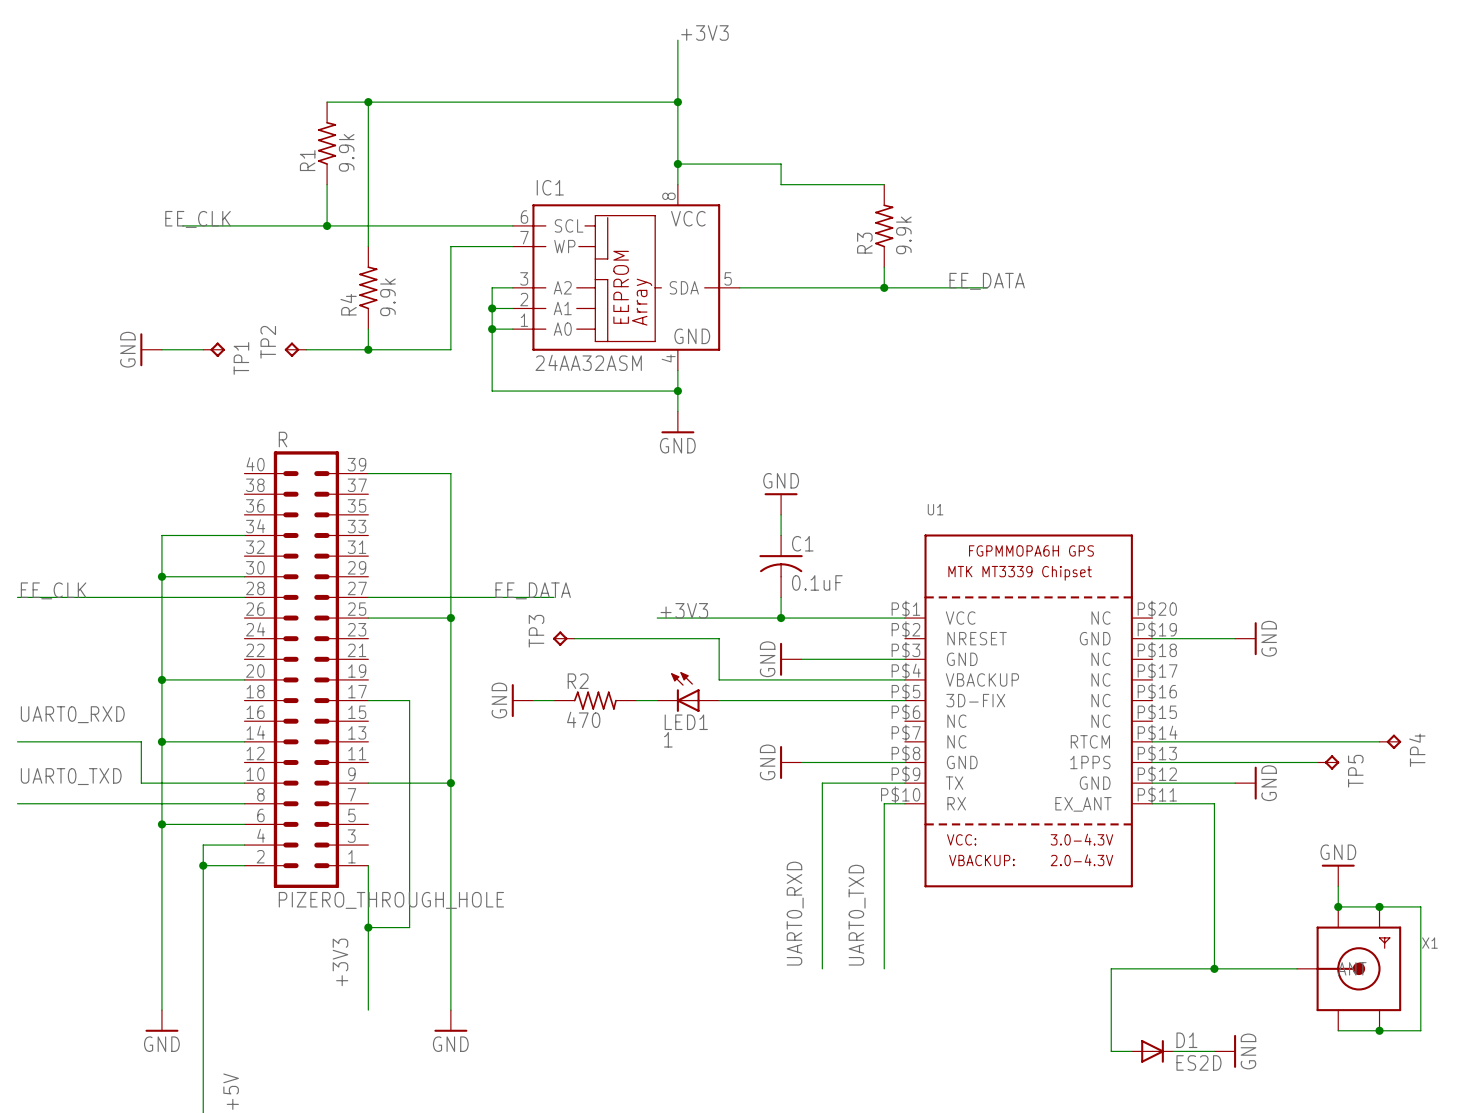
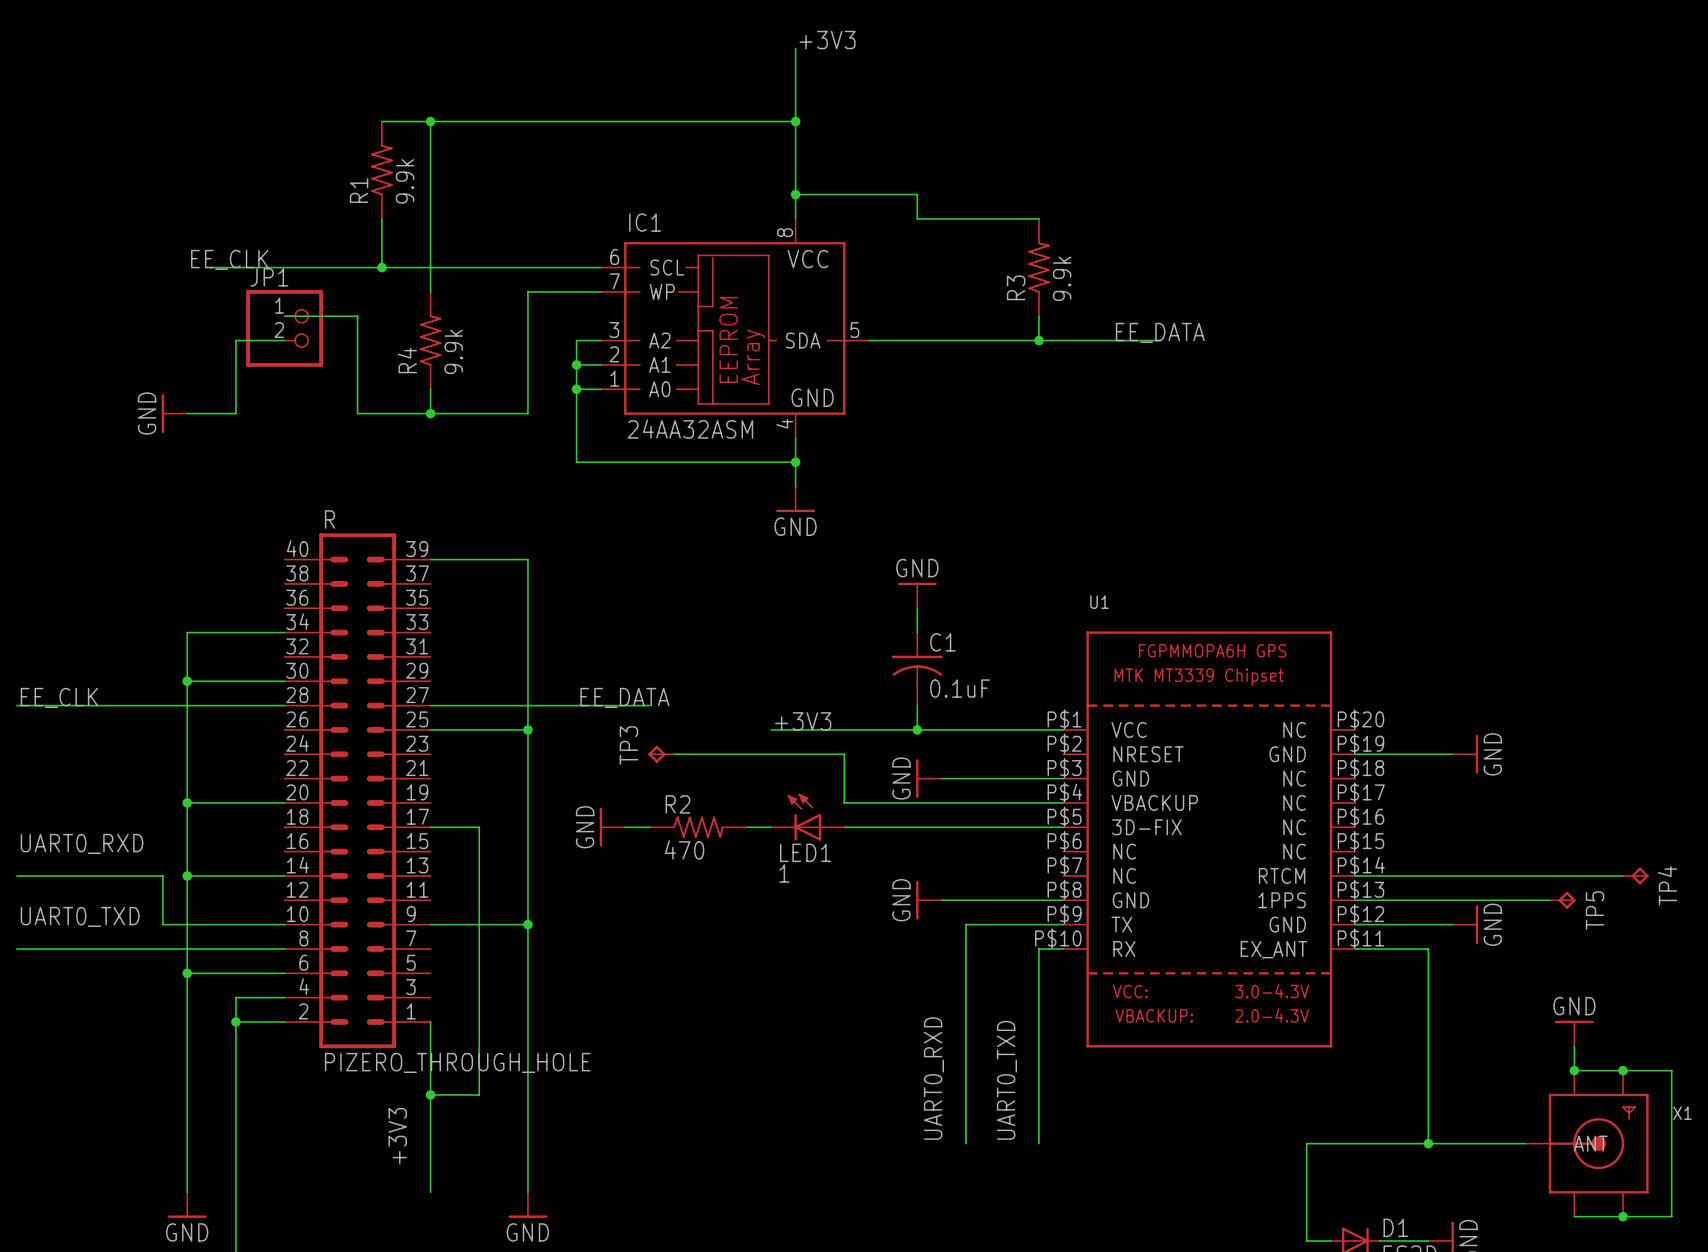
wire: none -> (284, 316) (357, 316) (357, 413)
JP1: none -> (284, 328)
wire: none -> (284, 340) (235, 340) (235, 413)
TP1: (214, 349) -> none
TP2: (295, 349) -> none

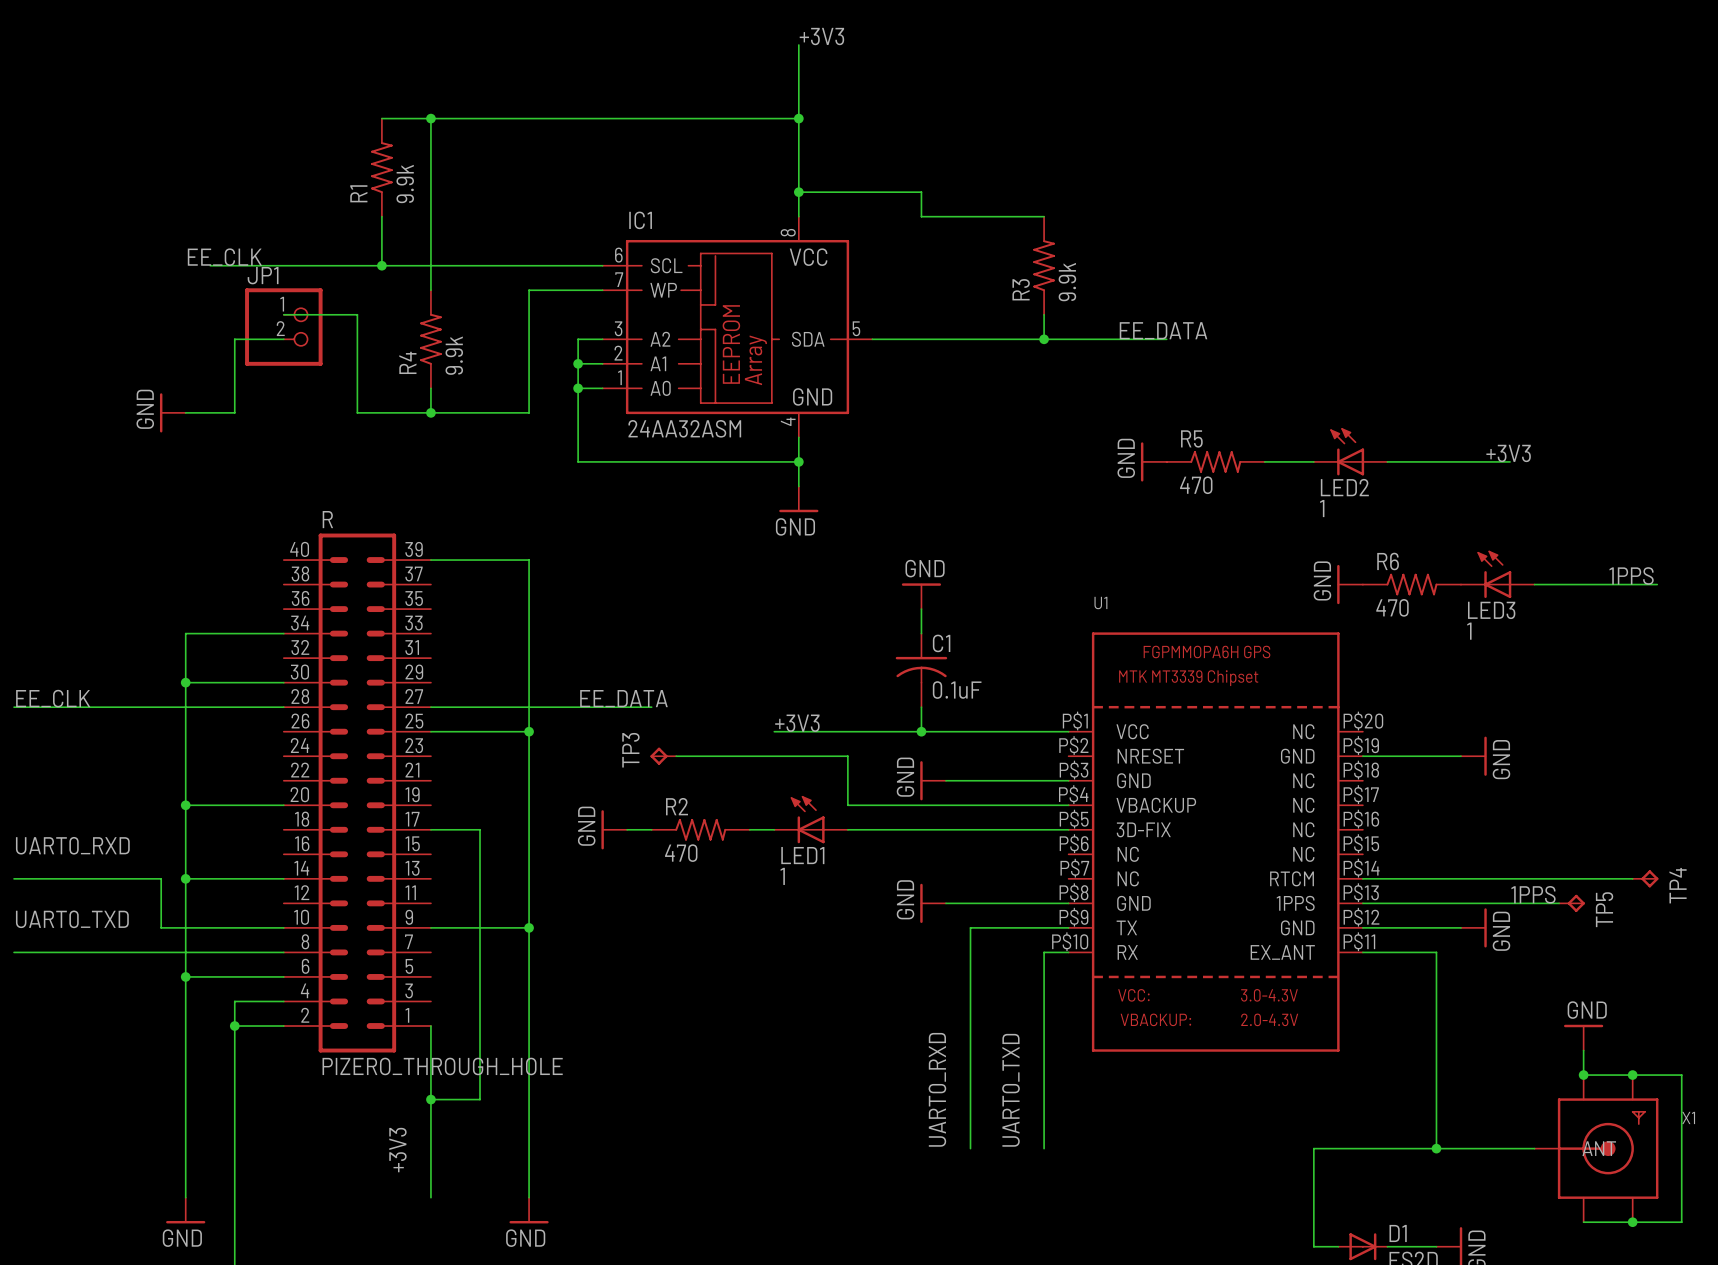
LED2: none -> 1 (1350, 451)
label: none -> +3V3 (1508, 453)
power symbol: none -> GND (1153, 461)
R5: none -> 470 (1215, 461)
wire: none -> (1264, 461) (1313, 461)
wire: none -> (1387, 461) (1510, 461)
LED3: none -> 1 (1497, 574)
label: none -> 1PPS (1631, 575)
power symbol: none -> GND (1350, 584)
R6: none -> 470 (1411, 584)
wire: none -> (1534, 584) (1657, 584)
label: none -> 1PPS (1533, 894)

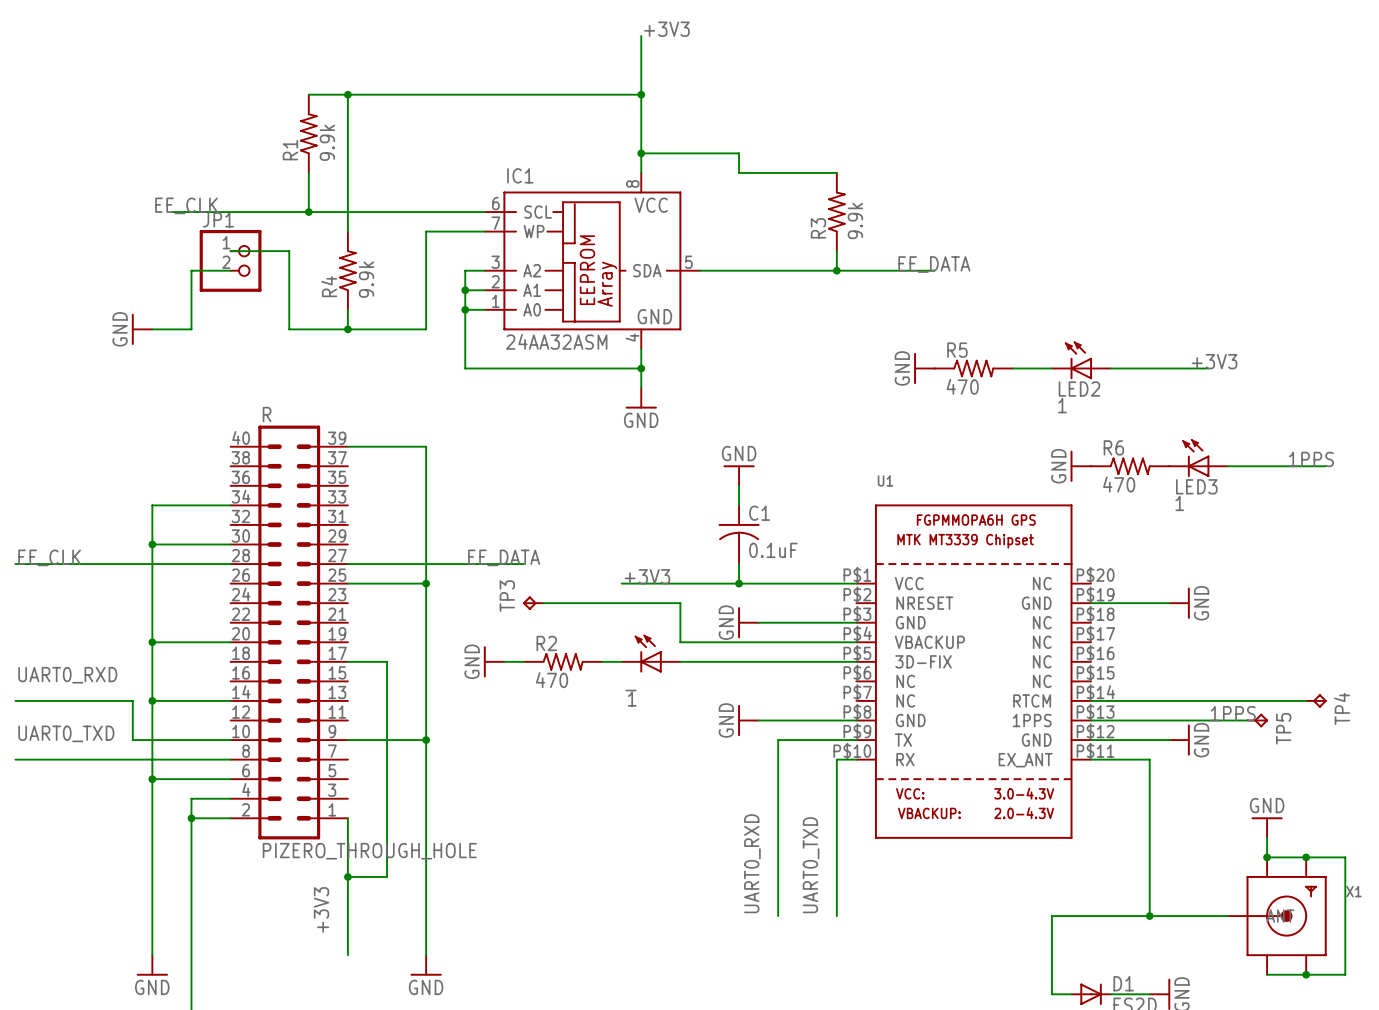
LED1 name: LED1 (802, 855) -> _ (631, 690)

